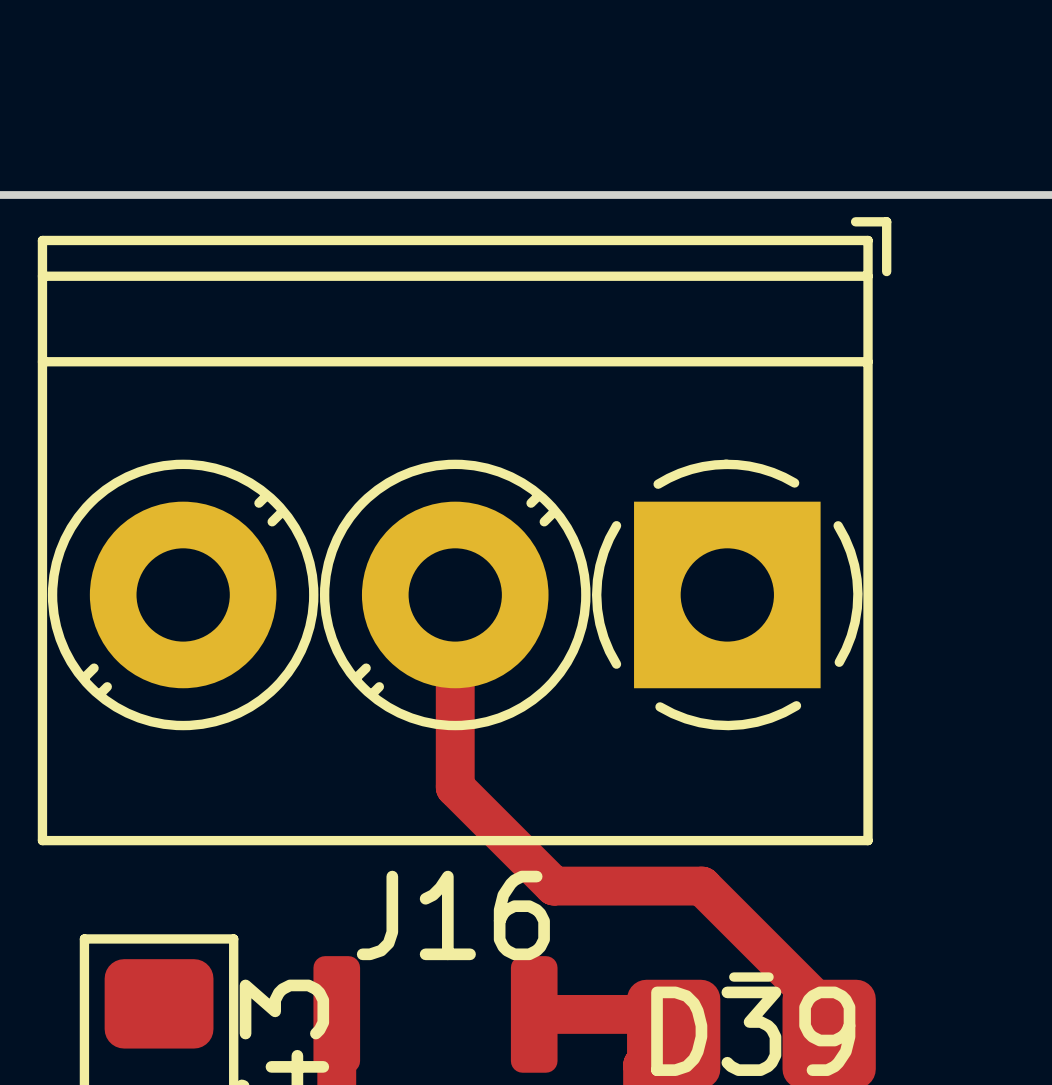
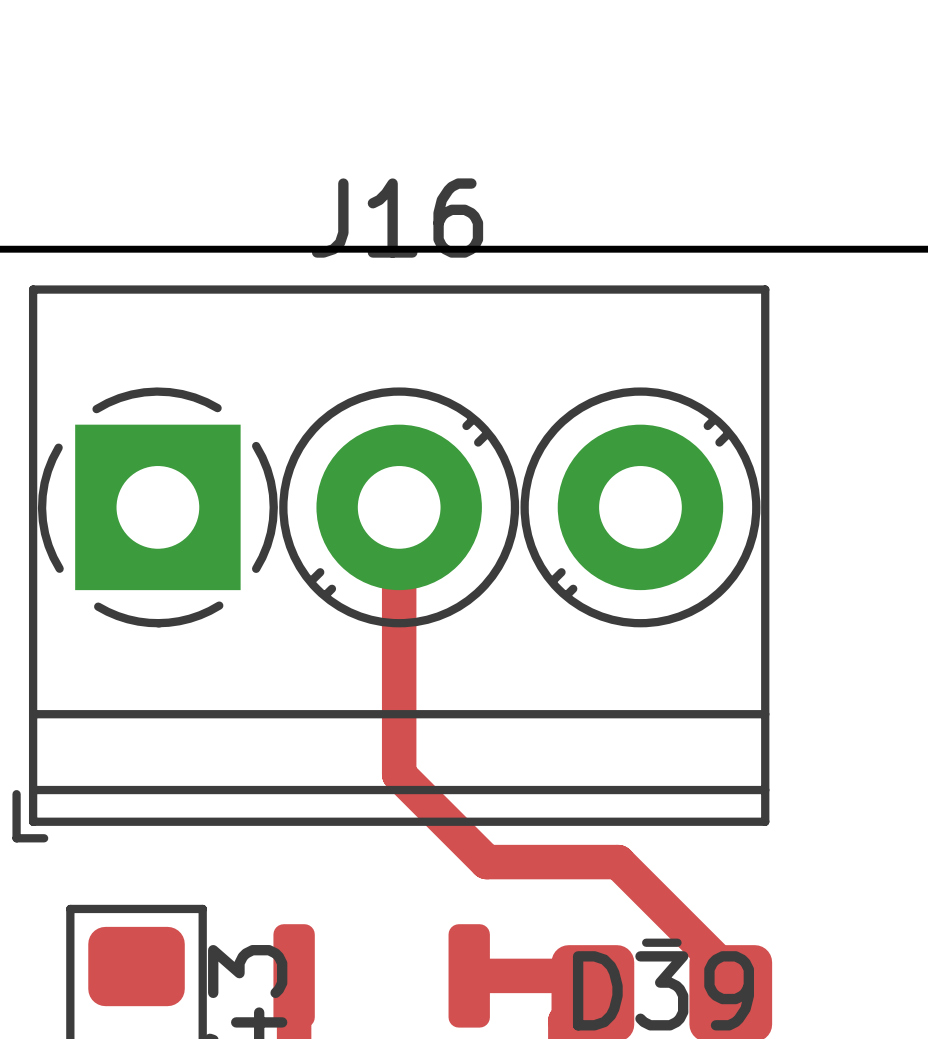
J16 rotation: 0° (464, 531) -> 180° (390, 563)

